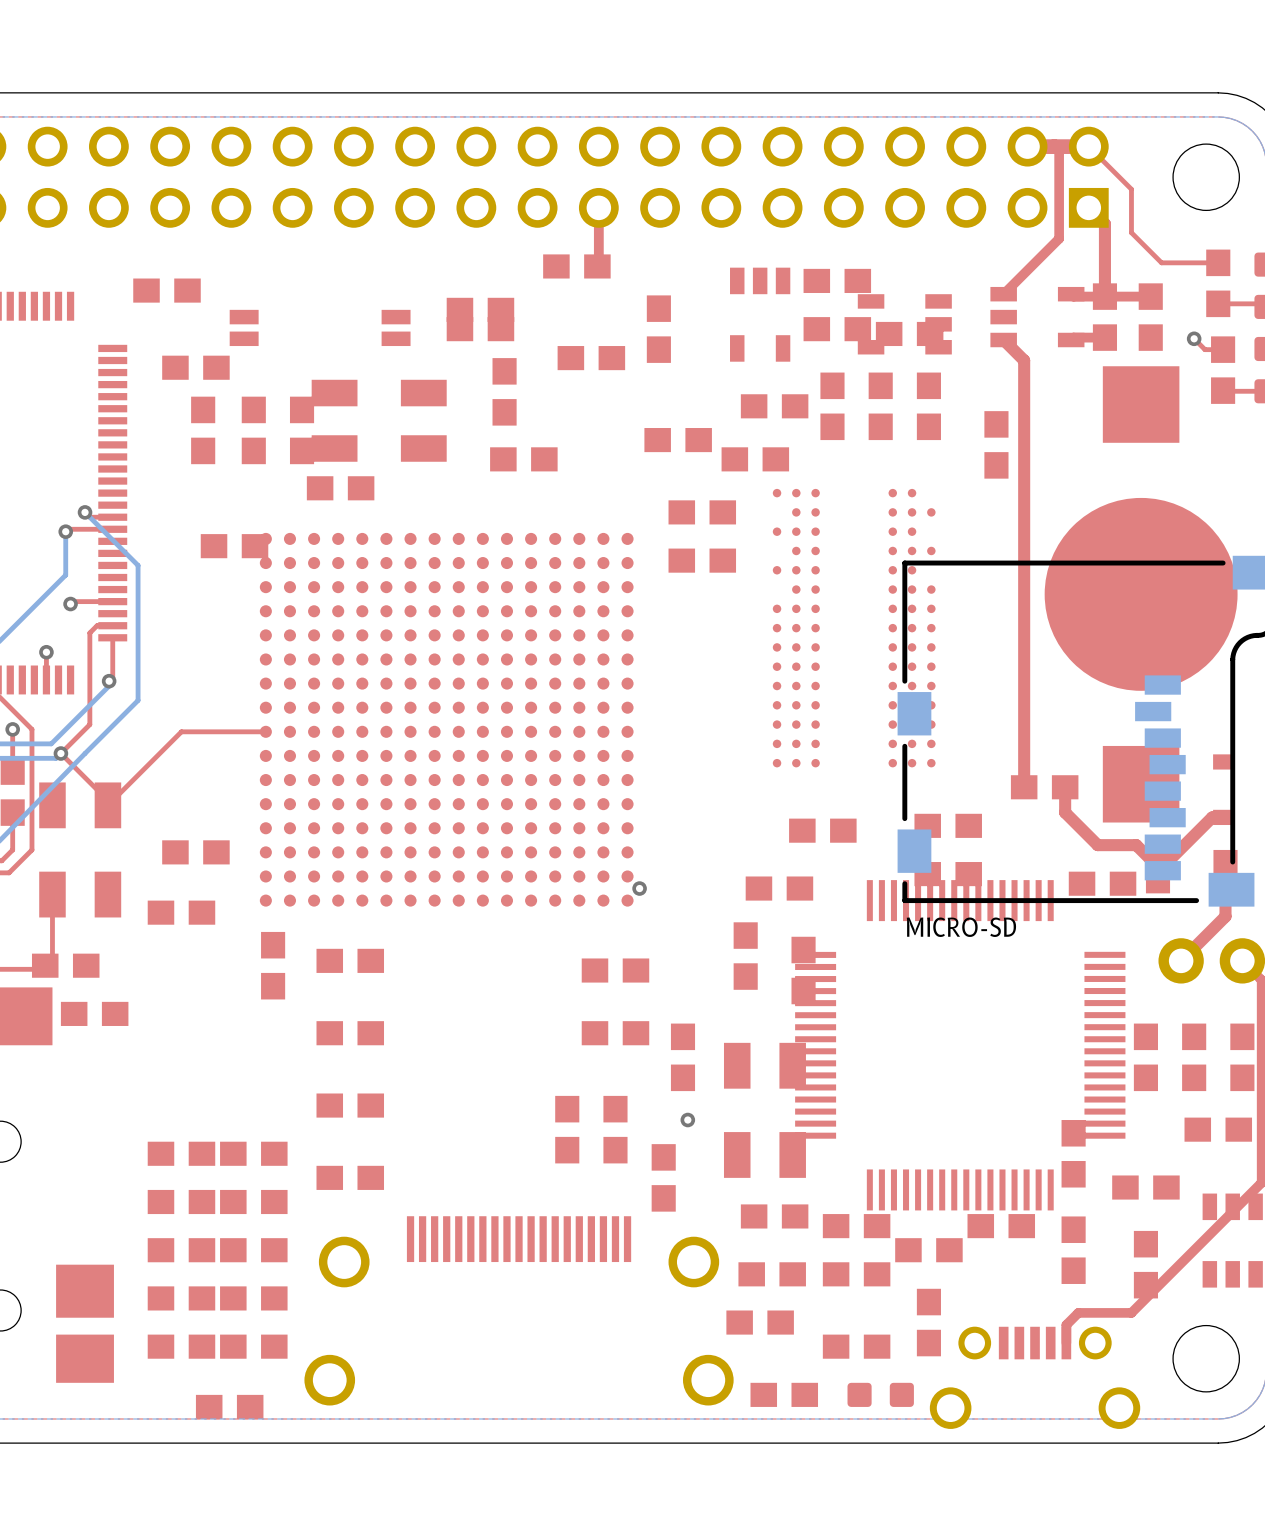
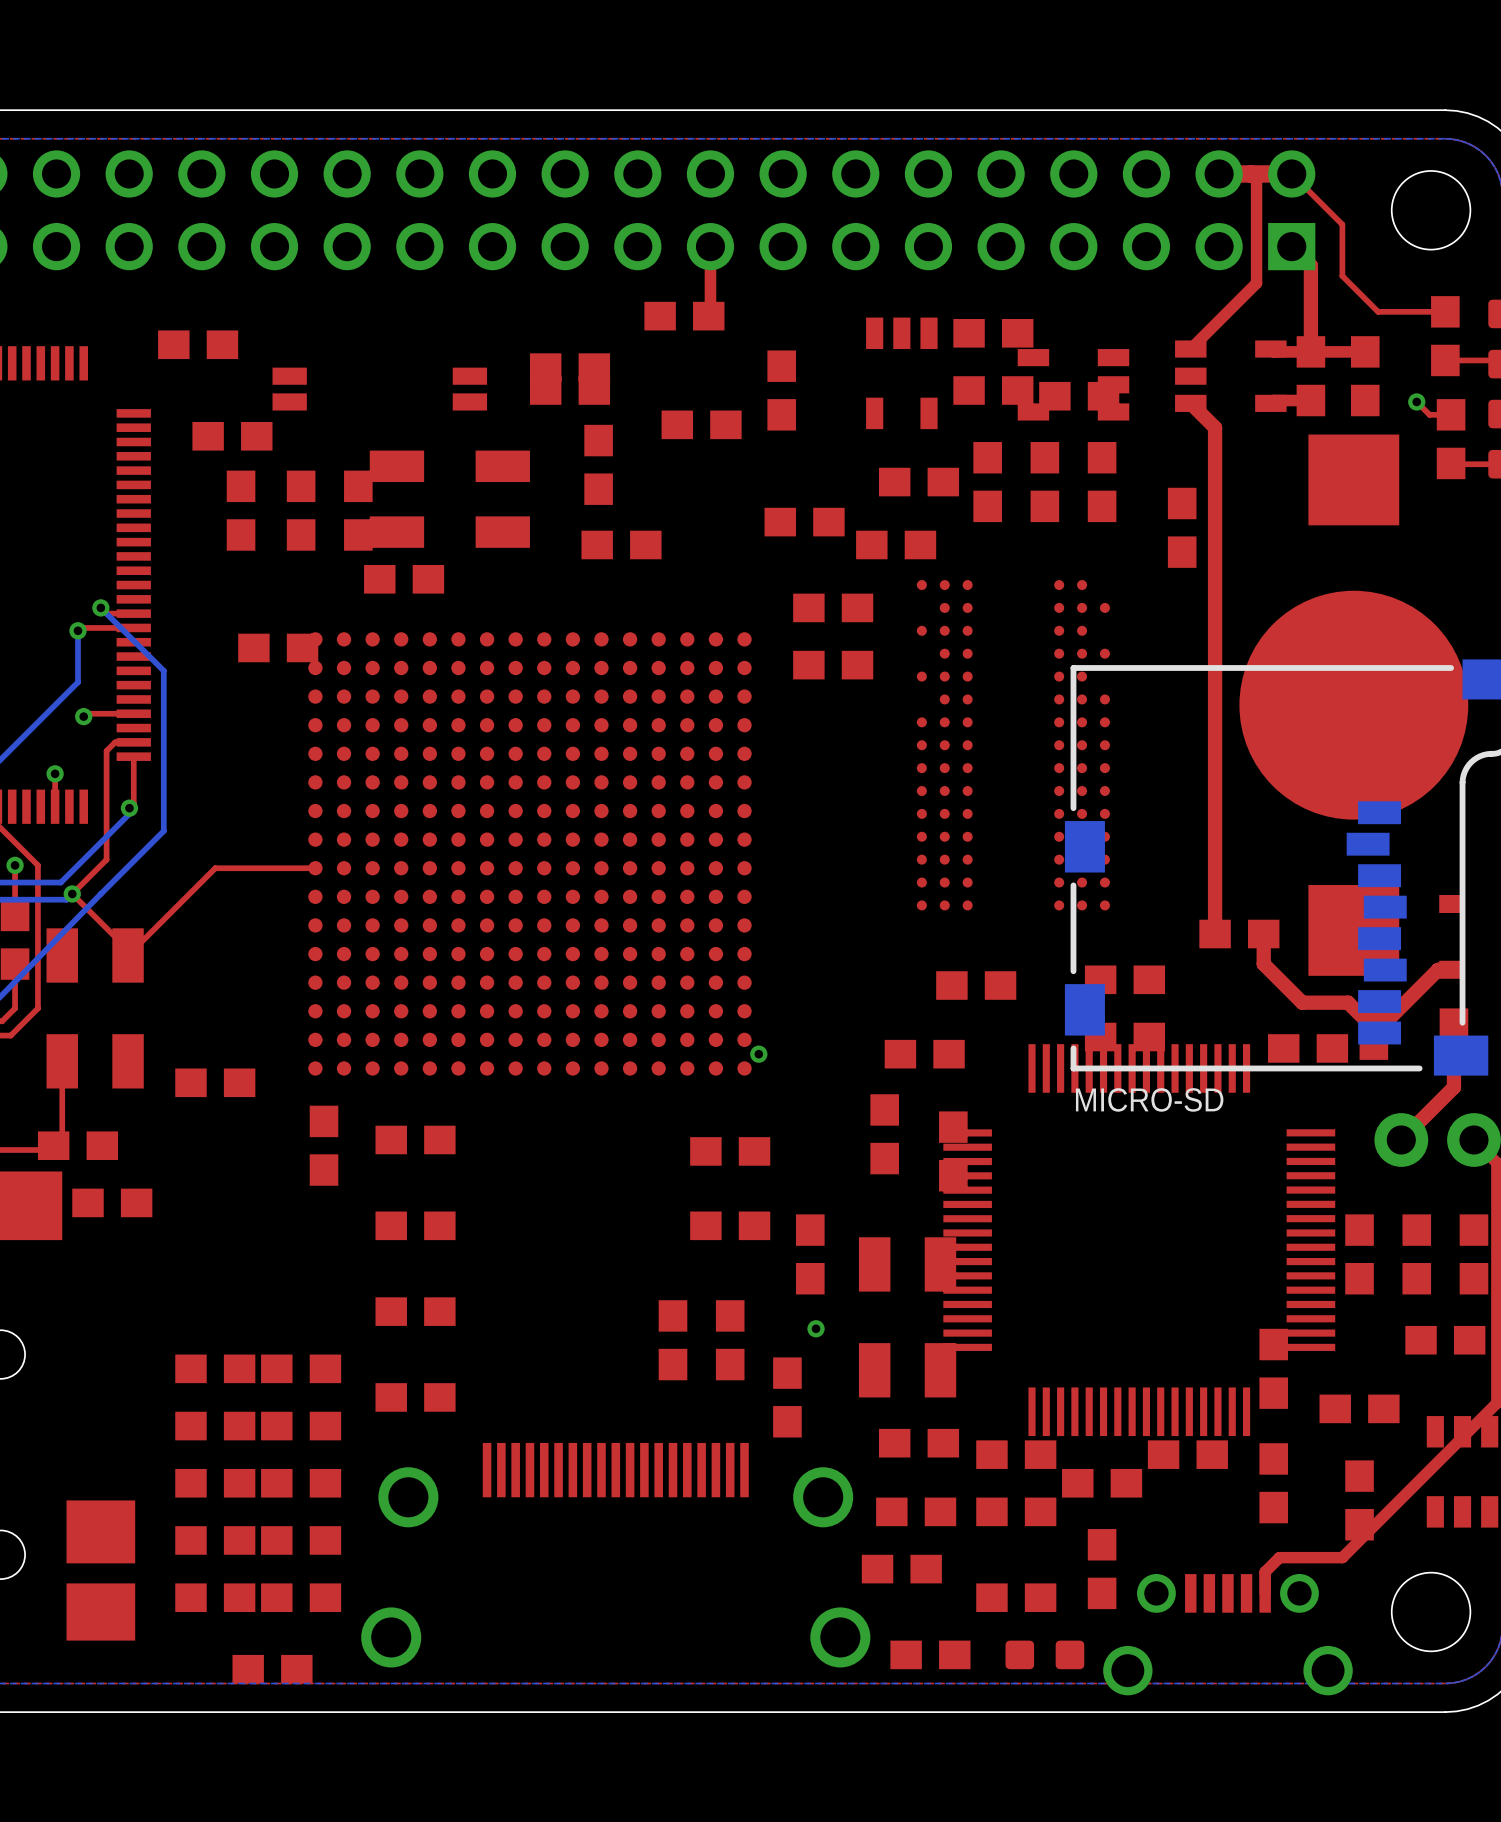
part: (195, 852) -> none

